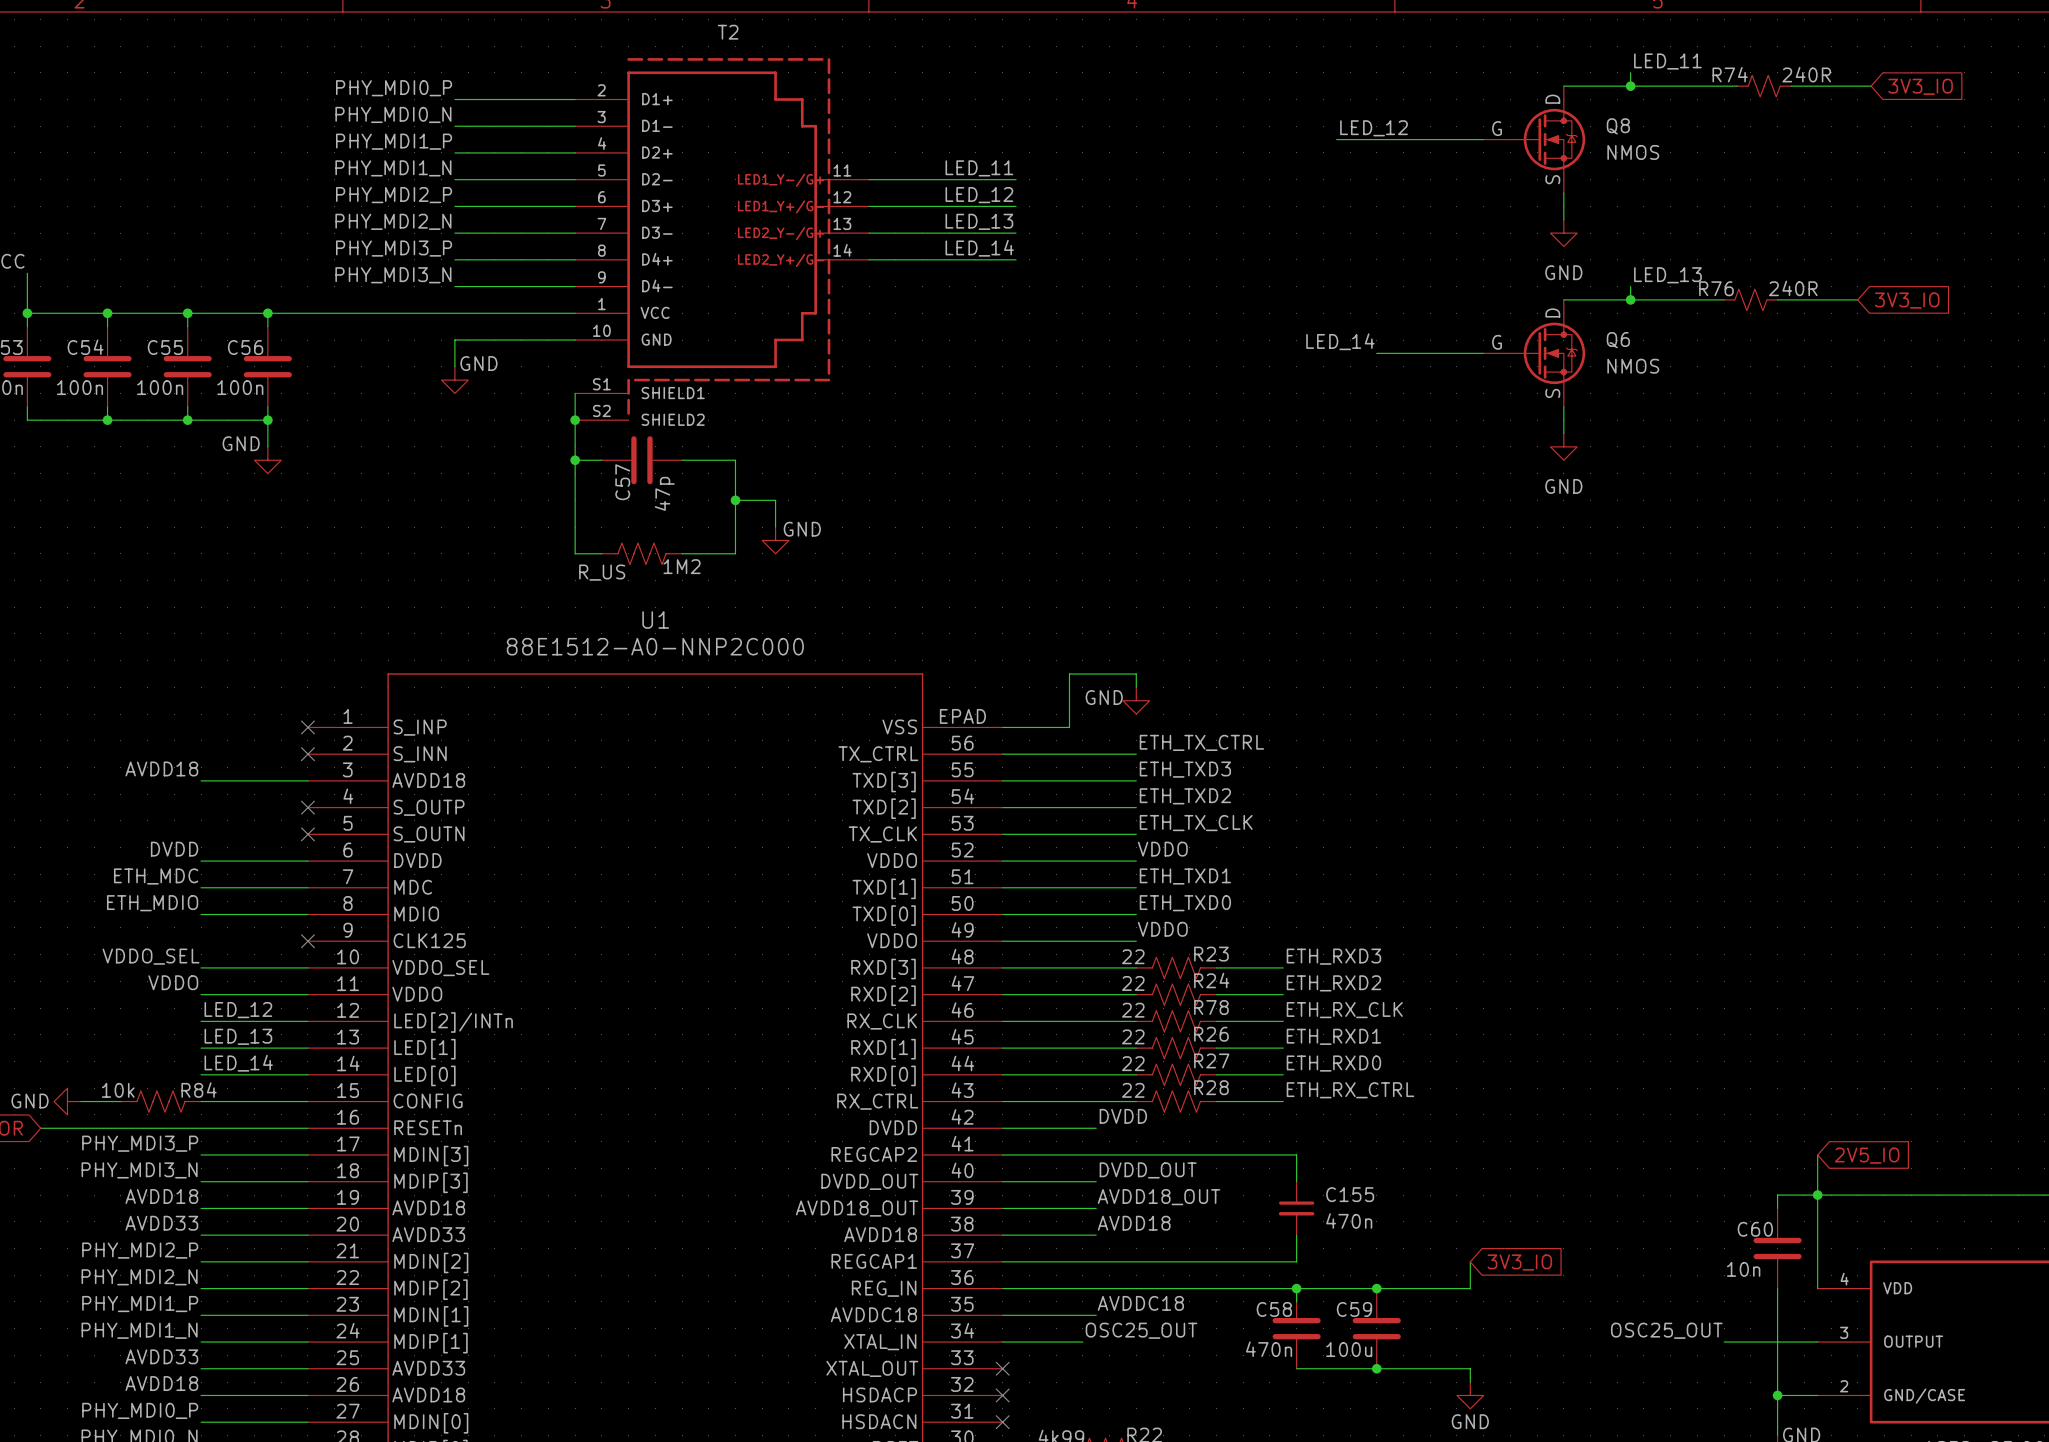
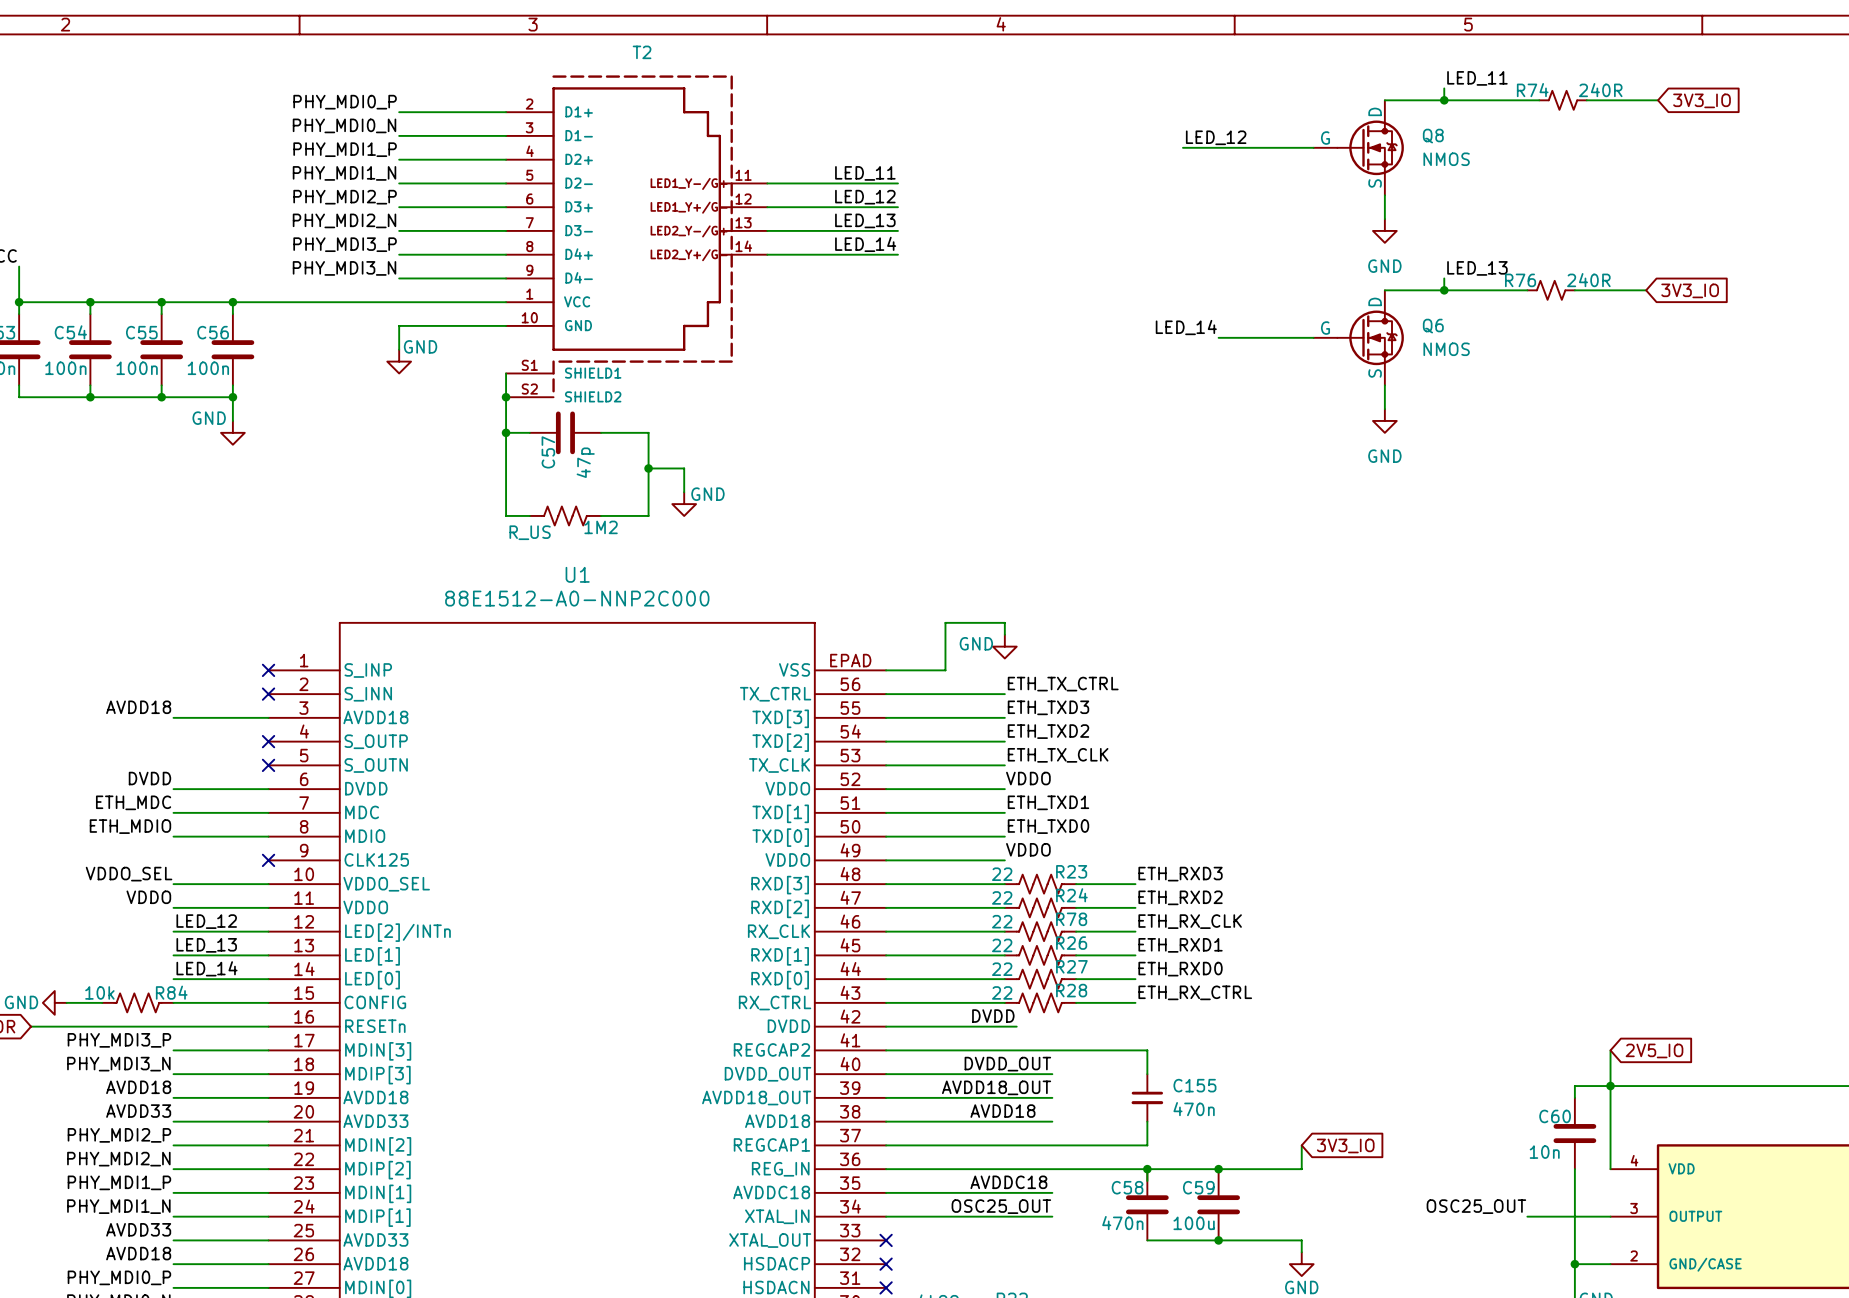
wire: none -> (969, 1026) (1016, 1026)
label position: DVDD_OUT (1148, 1170) -> DVDD_OUT (1007, 1064)
wire: none -> (969, 1074) (1052, 1074)
label position: AVDD18_OUT (1158, 1197) -> AVDD18_OUT (996, 1087)
wire: none -> (969, 1097) (1052, 1097)
wire: none -> (969, 1121) (1052, 1121)
wire: none -> (969, 1192) (1052, 1192)
label position: OSC25_OUT (1141, 1330) -> OSC25_OUT (1001, 1206)
wire: none -> (957, 1216) (1052, 1216)

